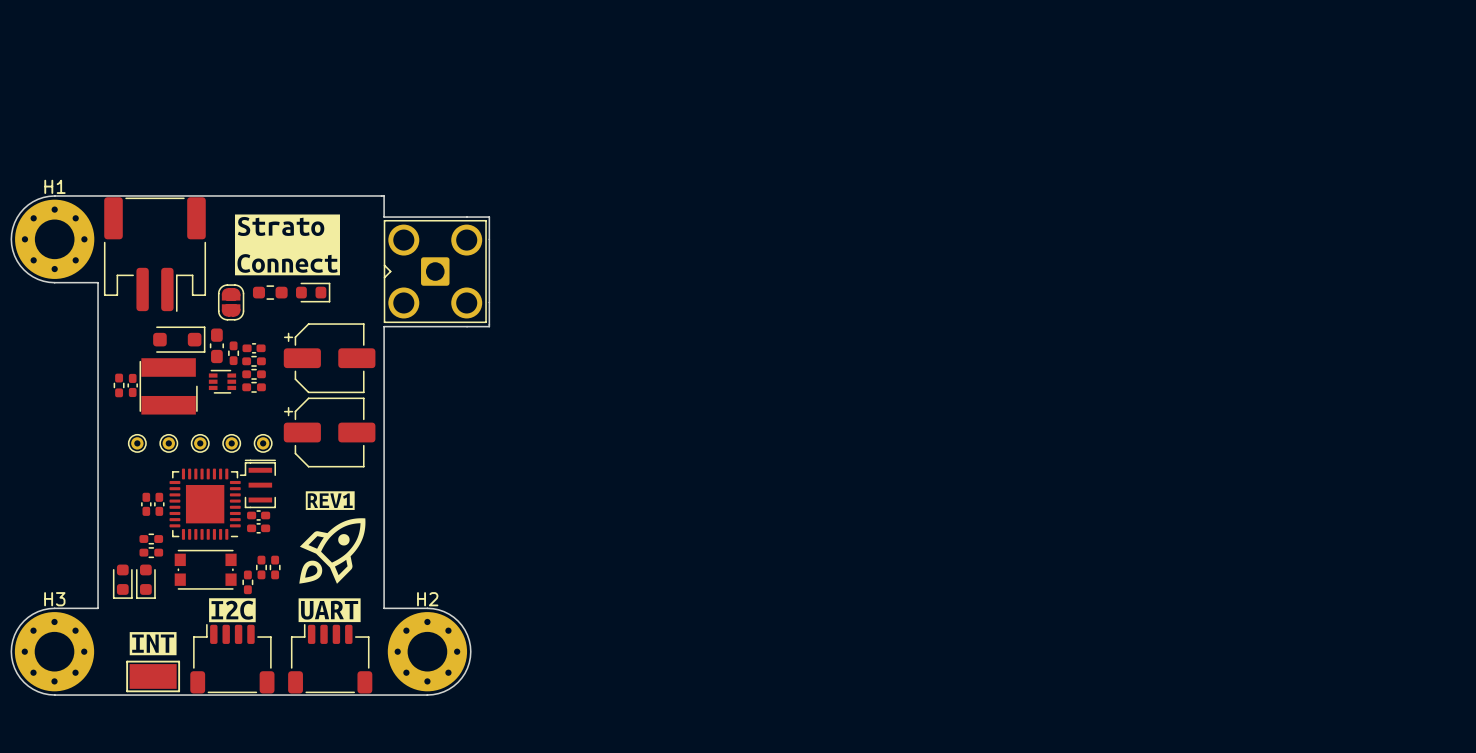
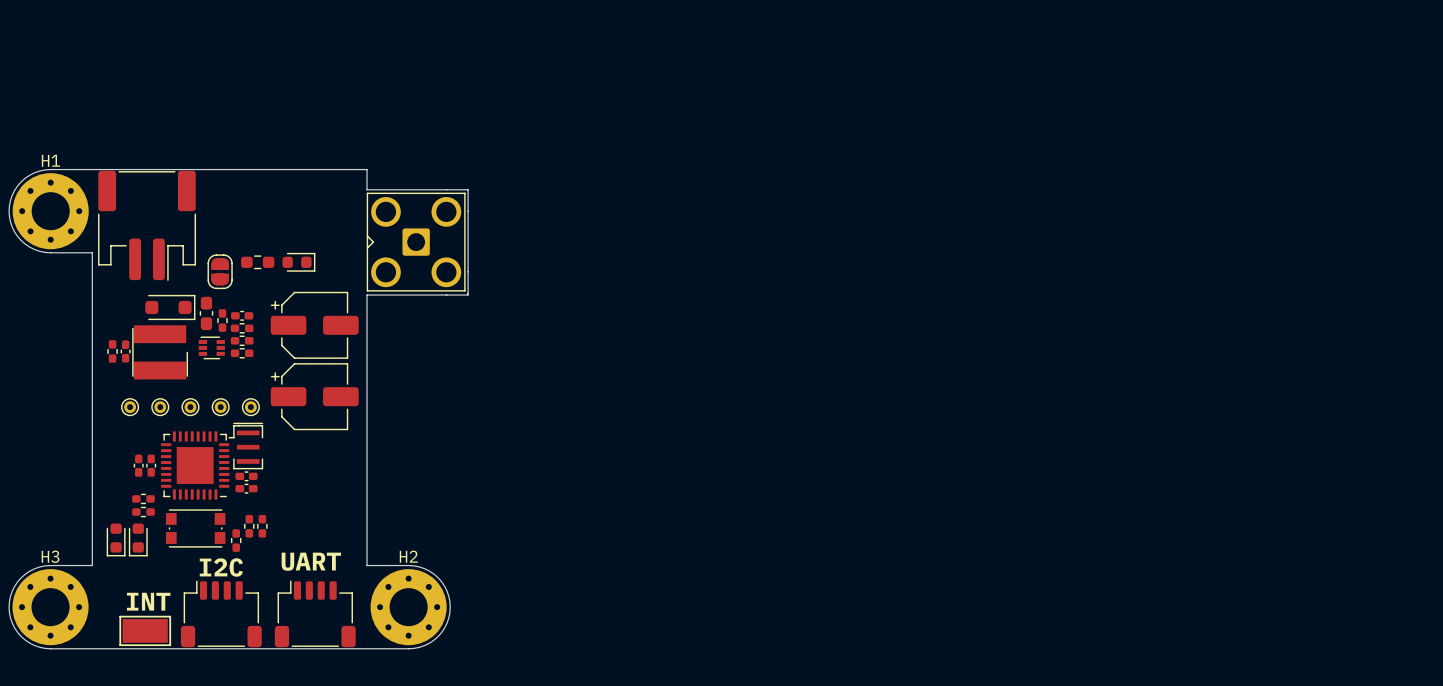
drawing: [234, 214, 340, 276] -> none
drawing: [298, 491, 366, 623] -> none
drawing: [209, 598, 256, 623] -> none
text: none -> UART (311, 561)
text: none -> I2C (221, 567)
drawing: [129, 632, 177, 656] -> none
text: none -> INT (148, 601)

